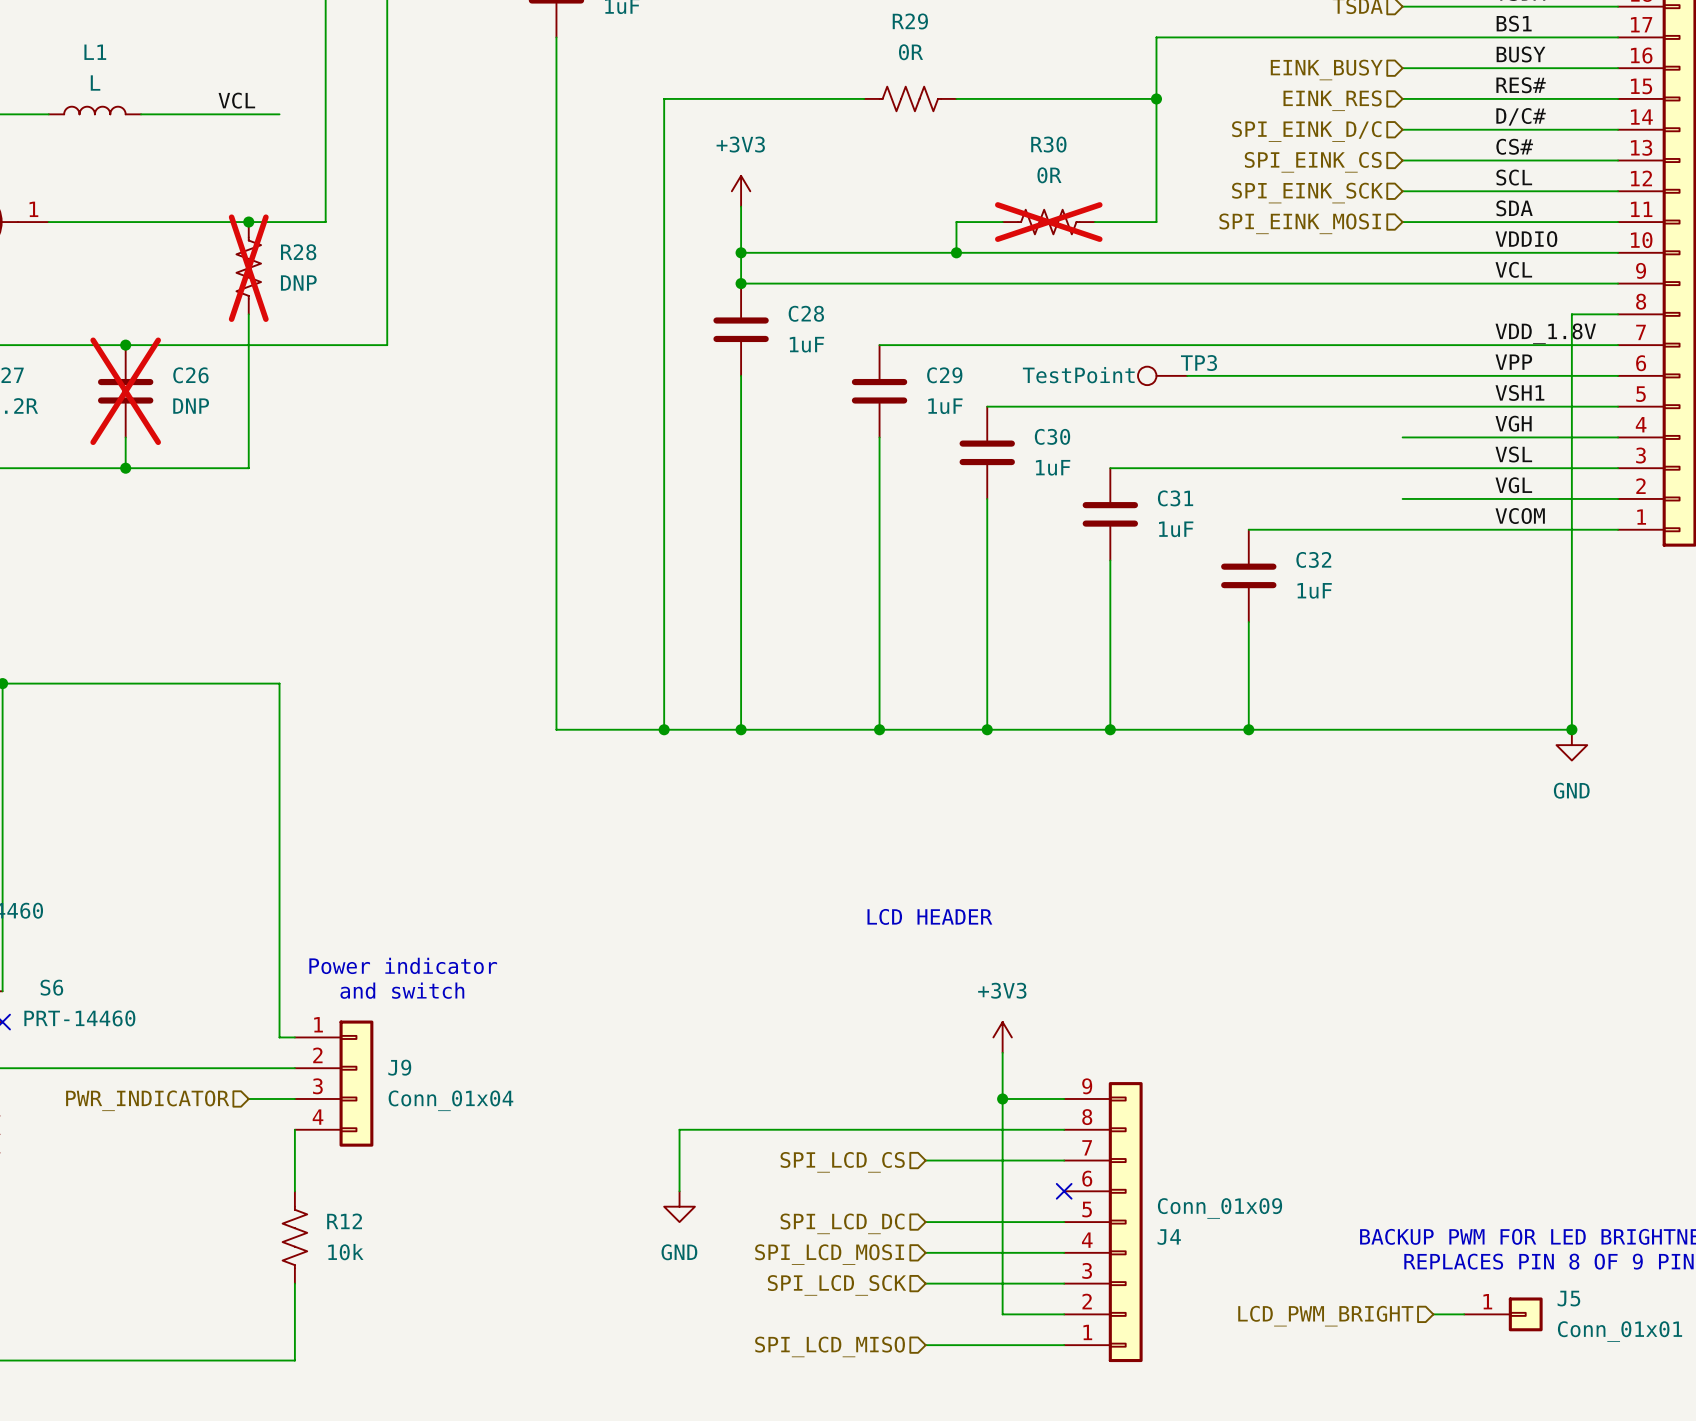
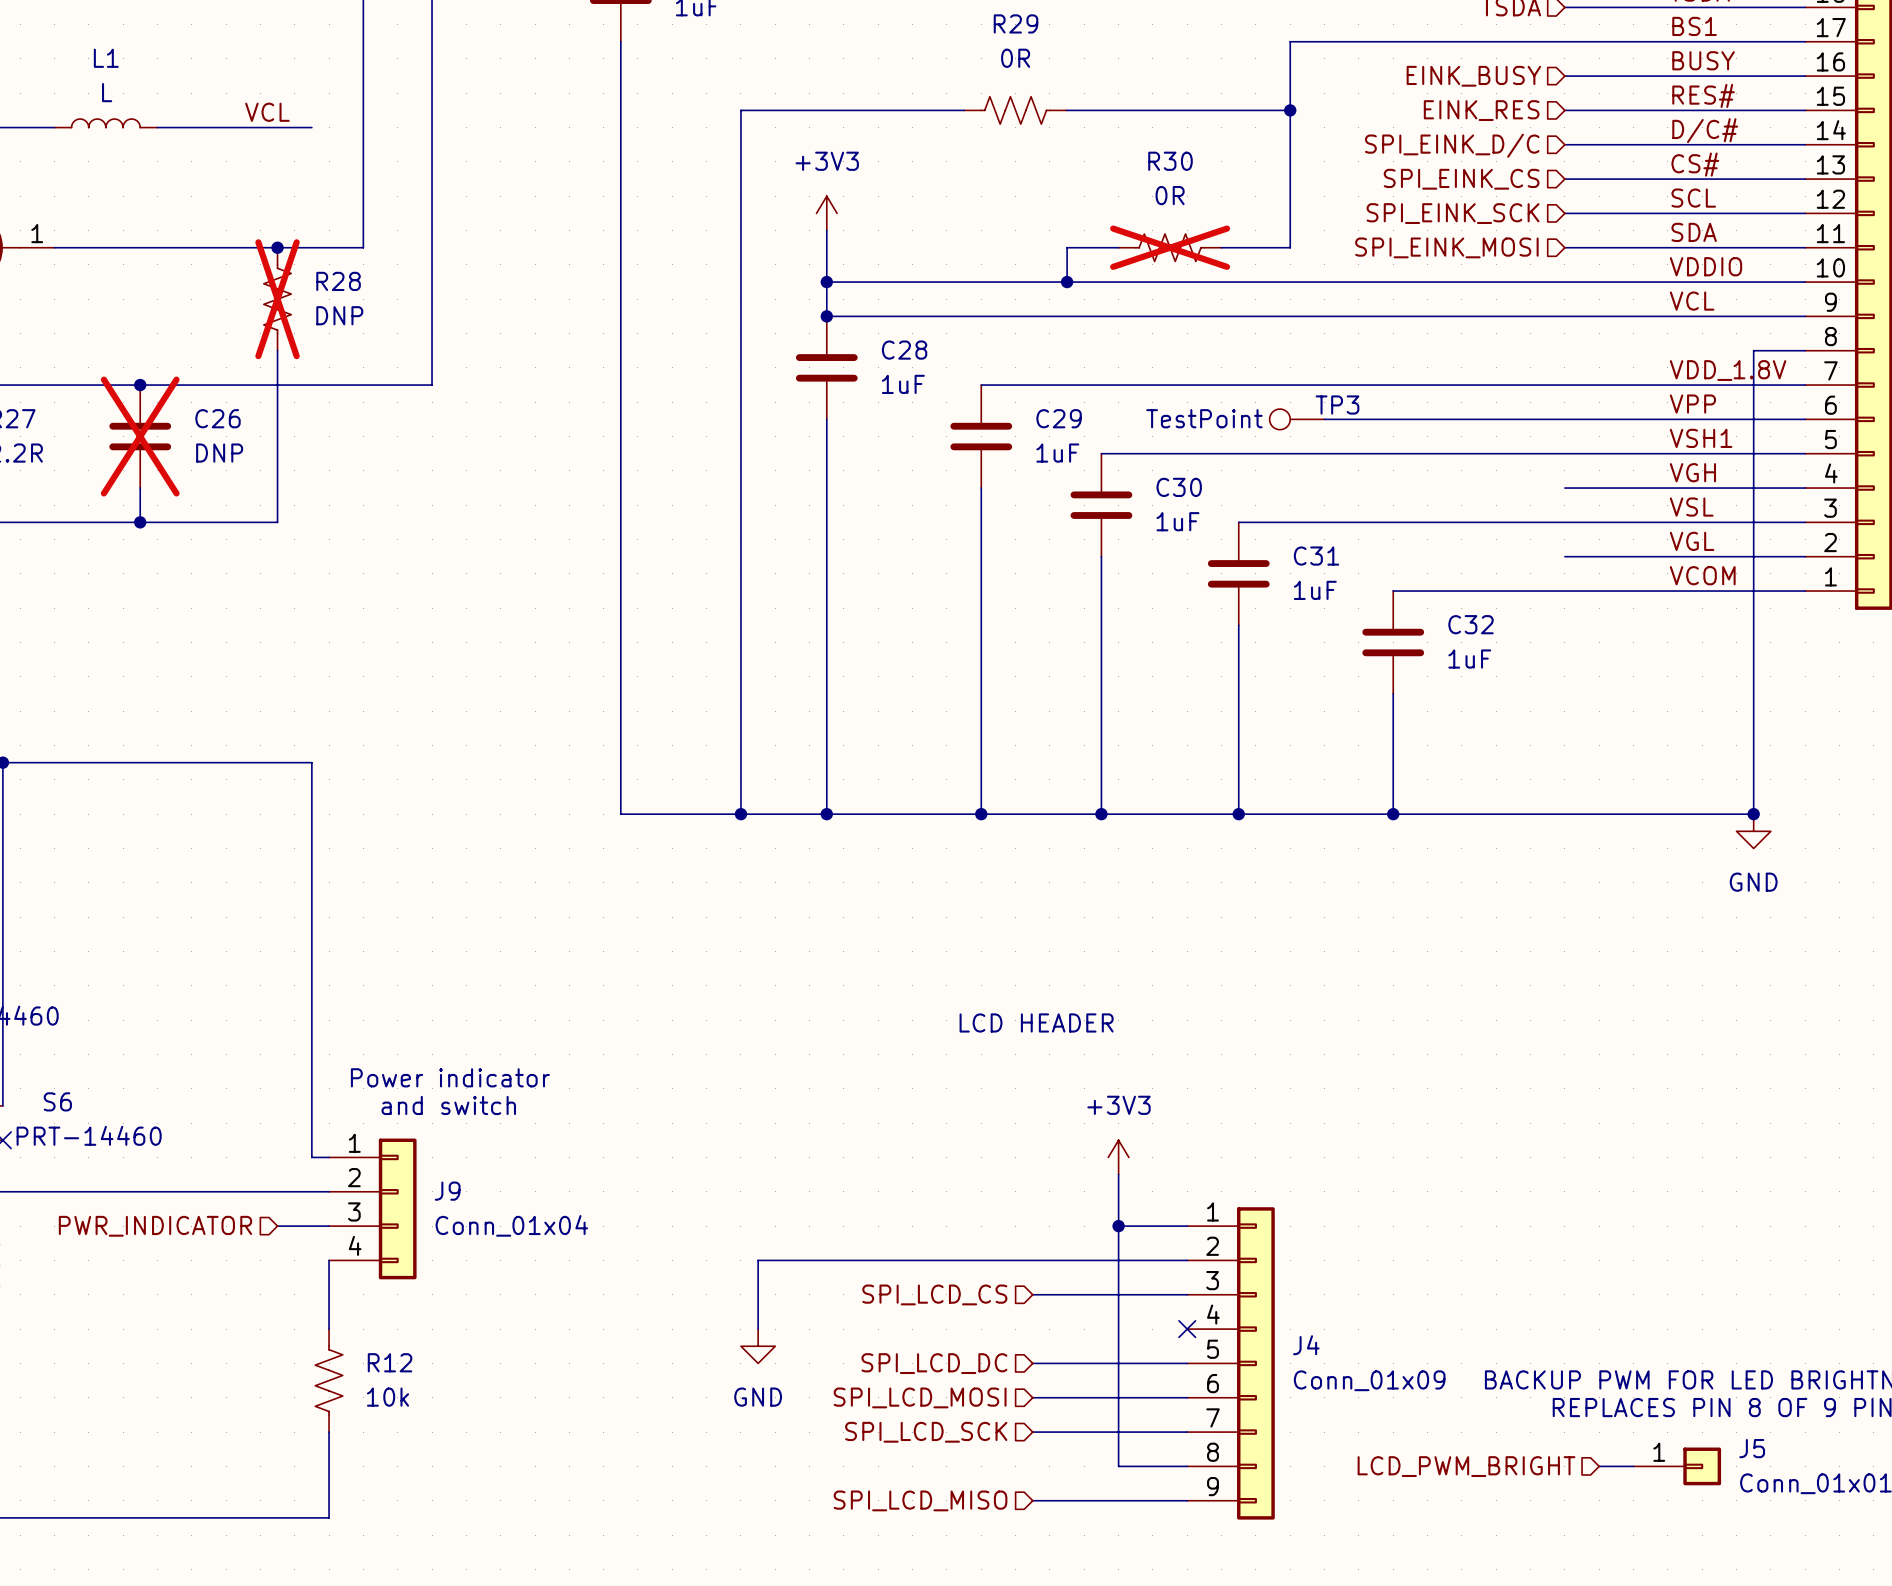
J4 flip: as is (1125, 1222) -> up-down (1255, 1363)

